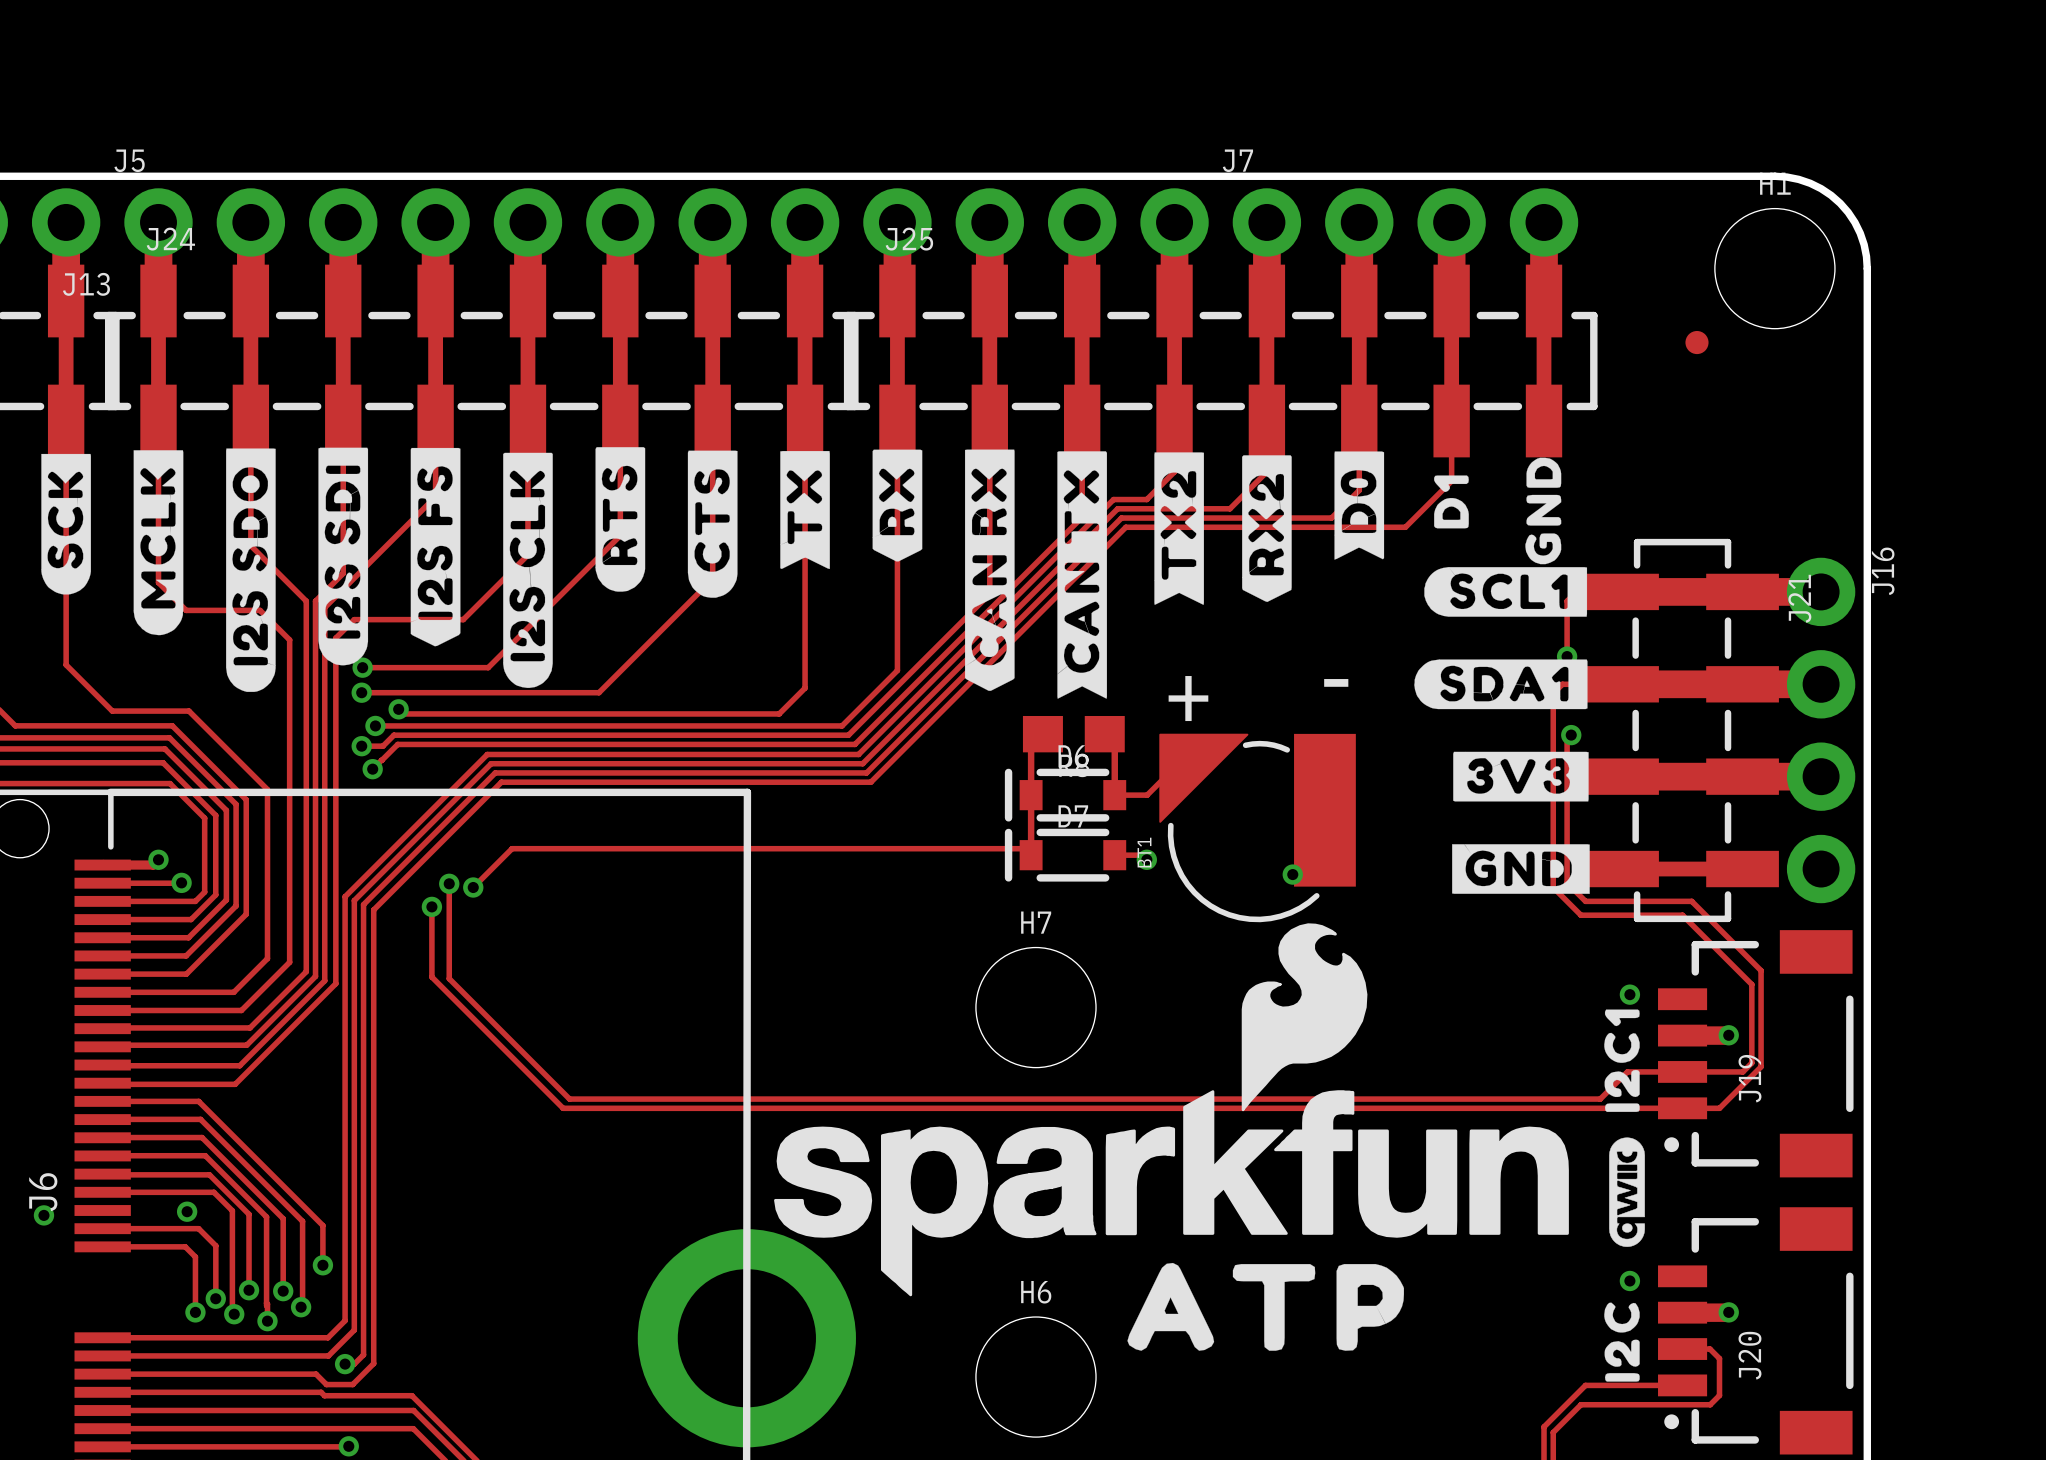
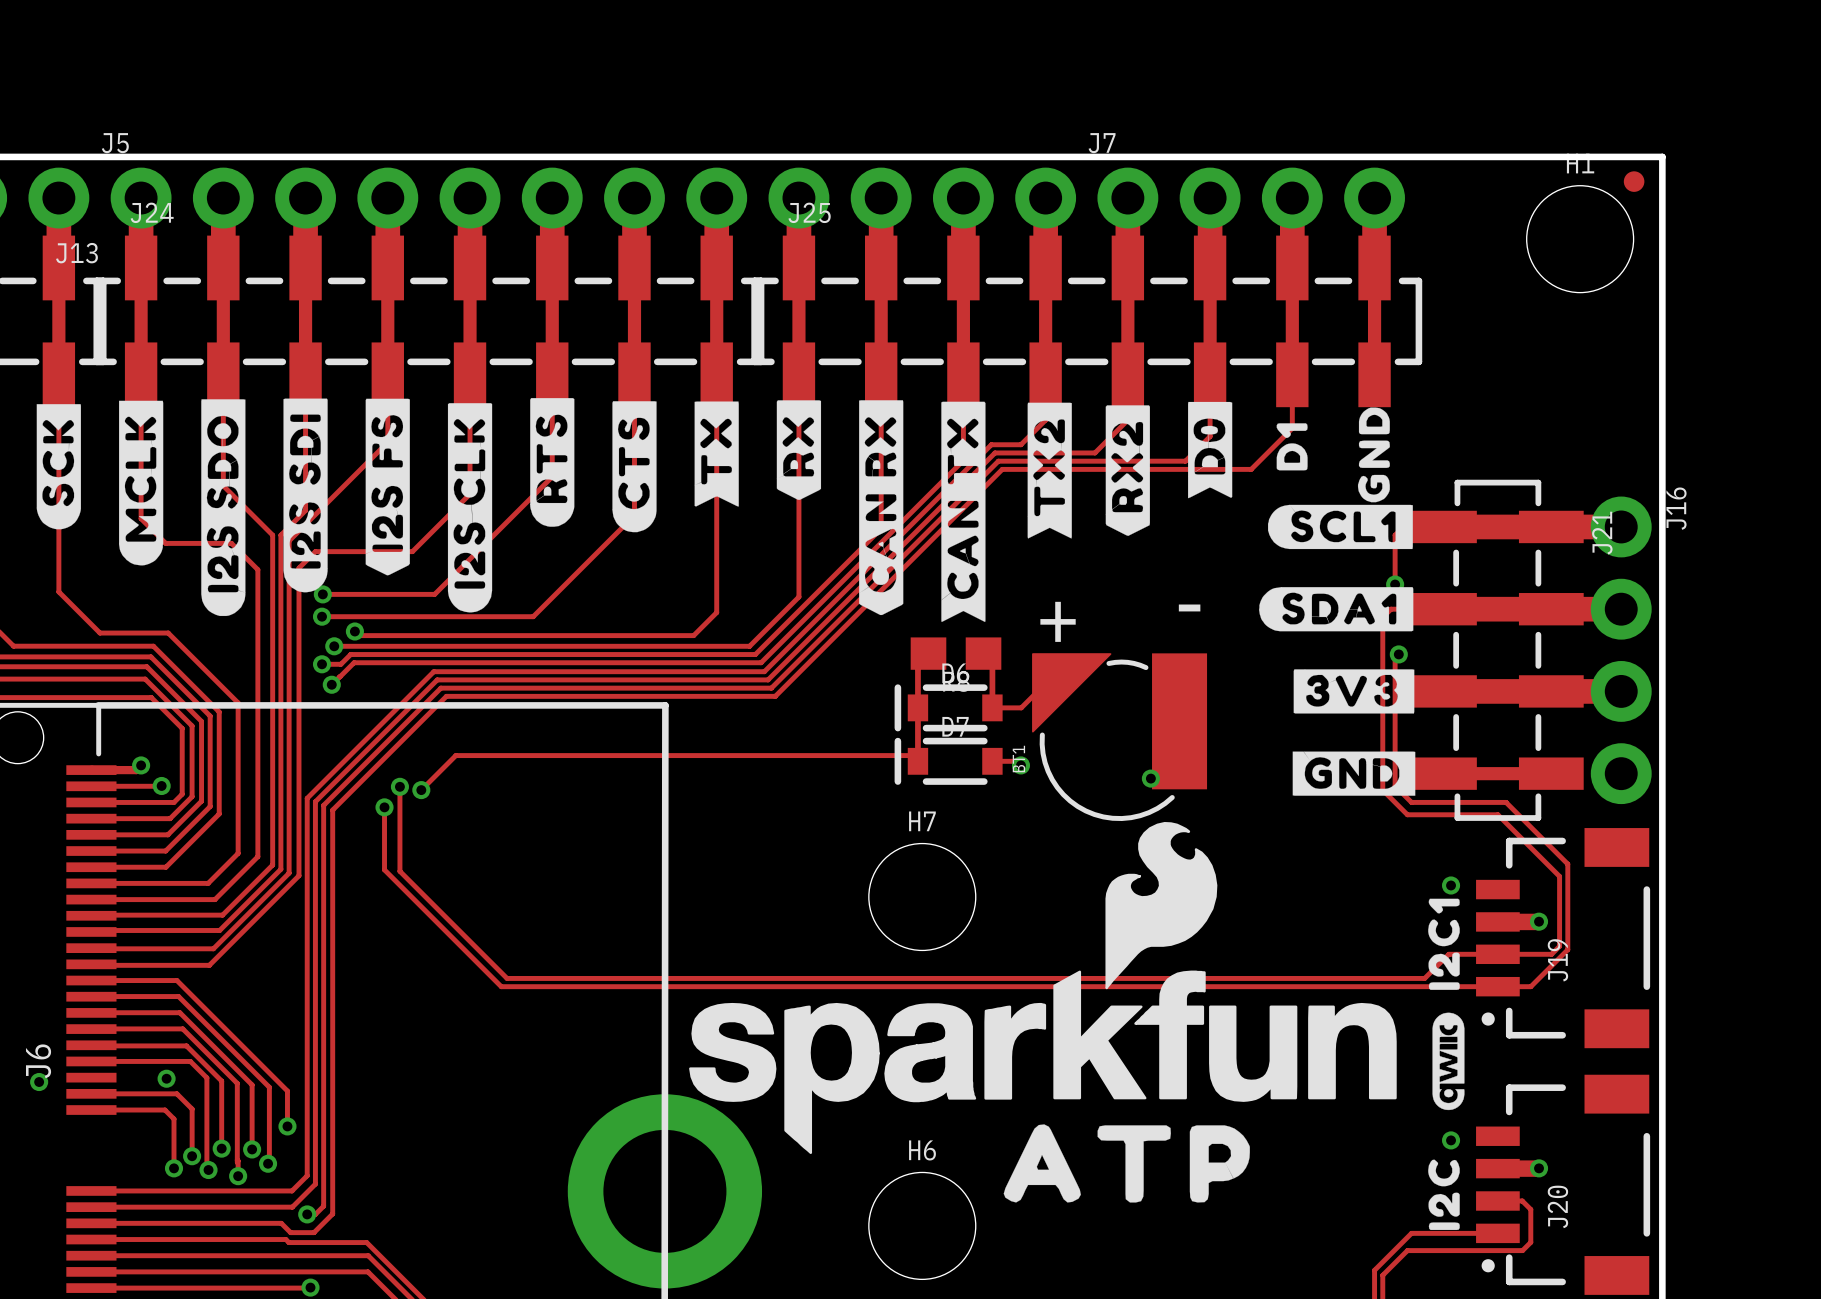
board edge: (1774, 176) (1798, 179) (1810, 183) (1831, 195) (1840, 203) (1848, 212) (1860, 233) (1864, 244) (1867, 268) -> (1580, 156) (1662, 156) (1662, 239)
part position: (1696, 342) -> (1634, 181)

